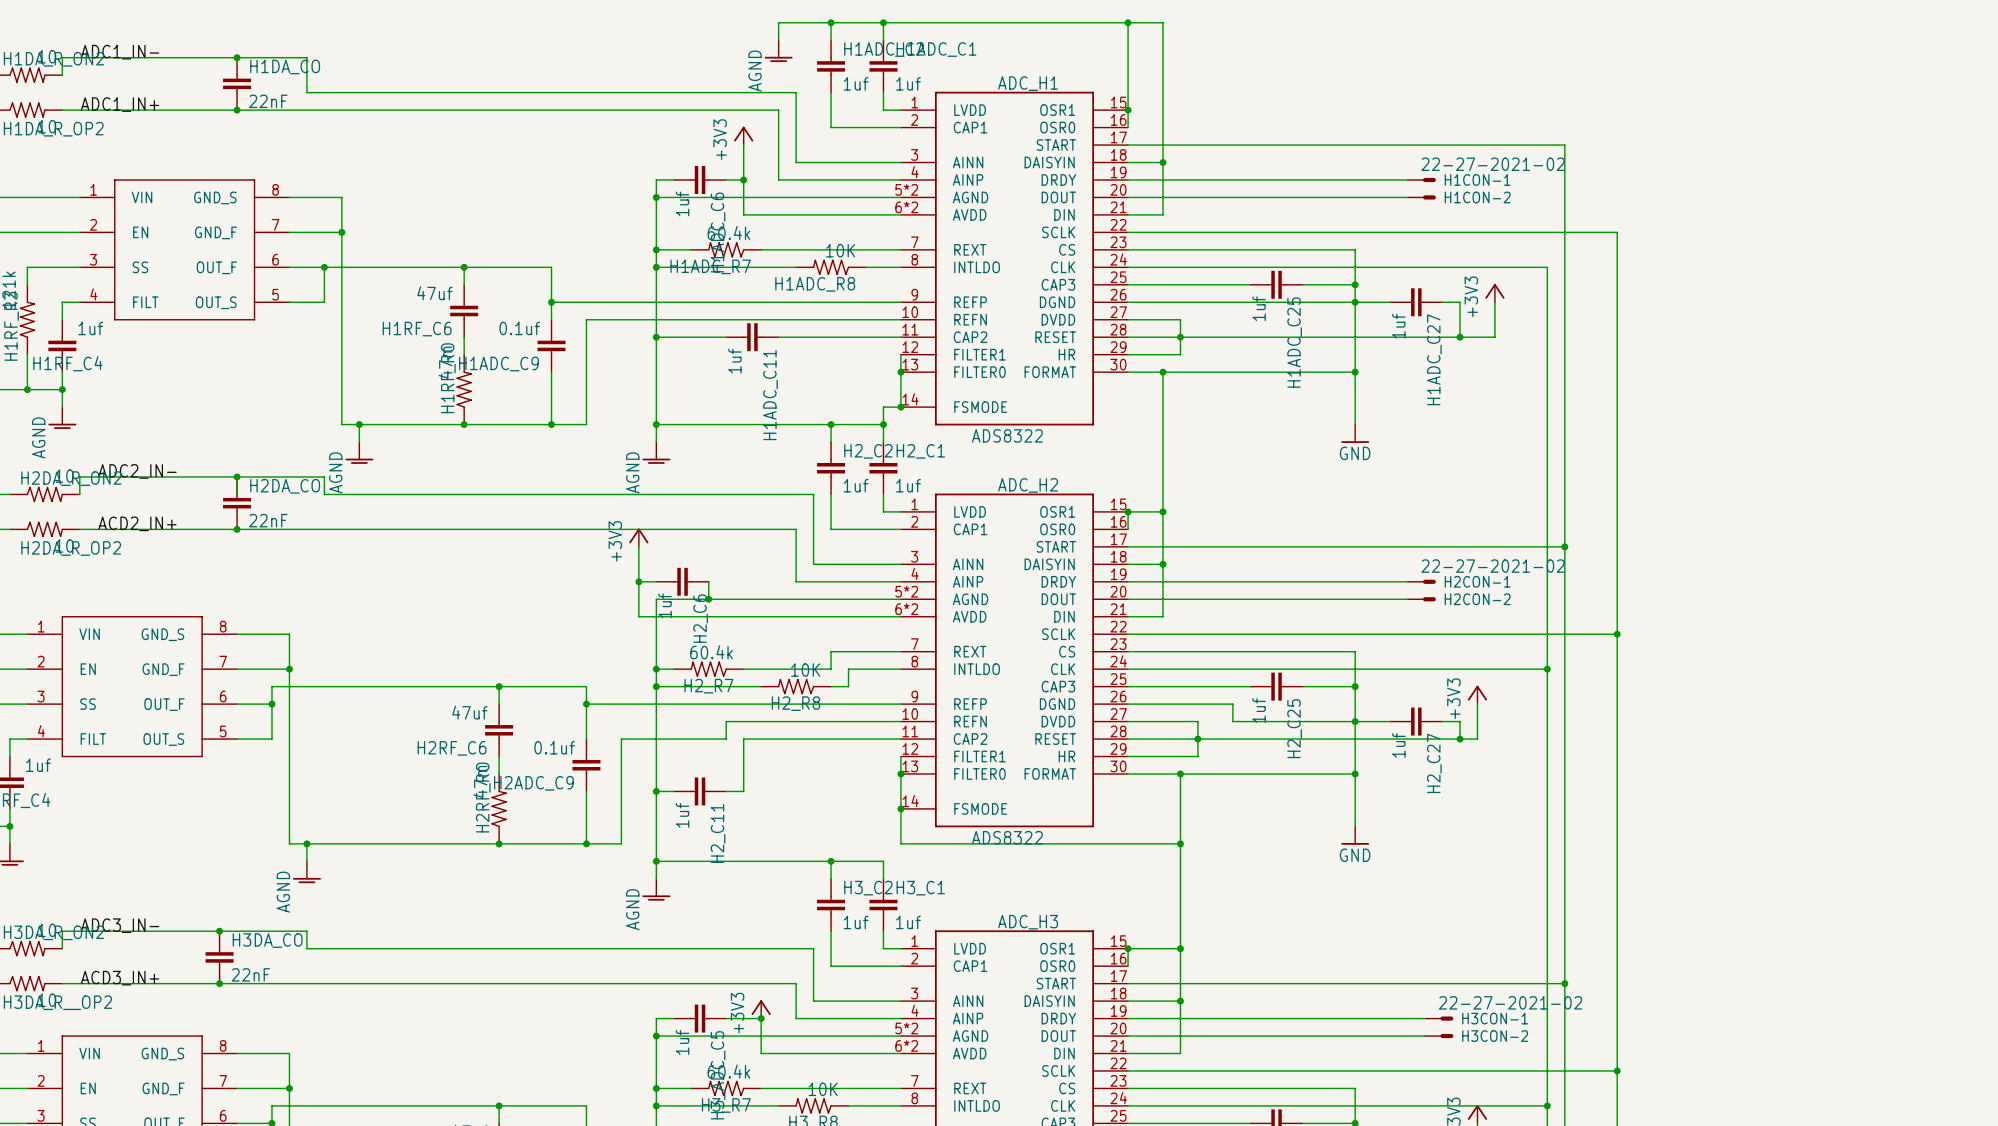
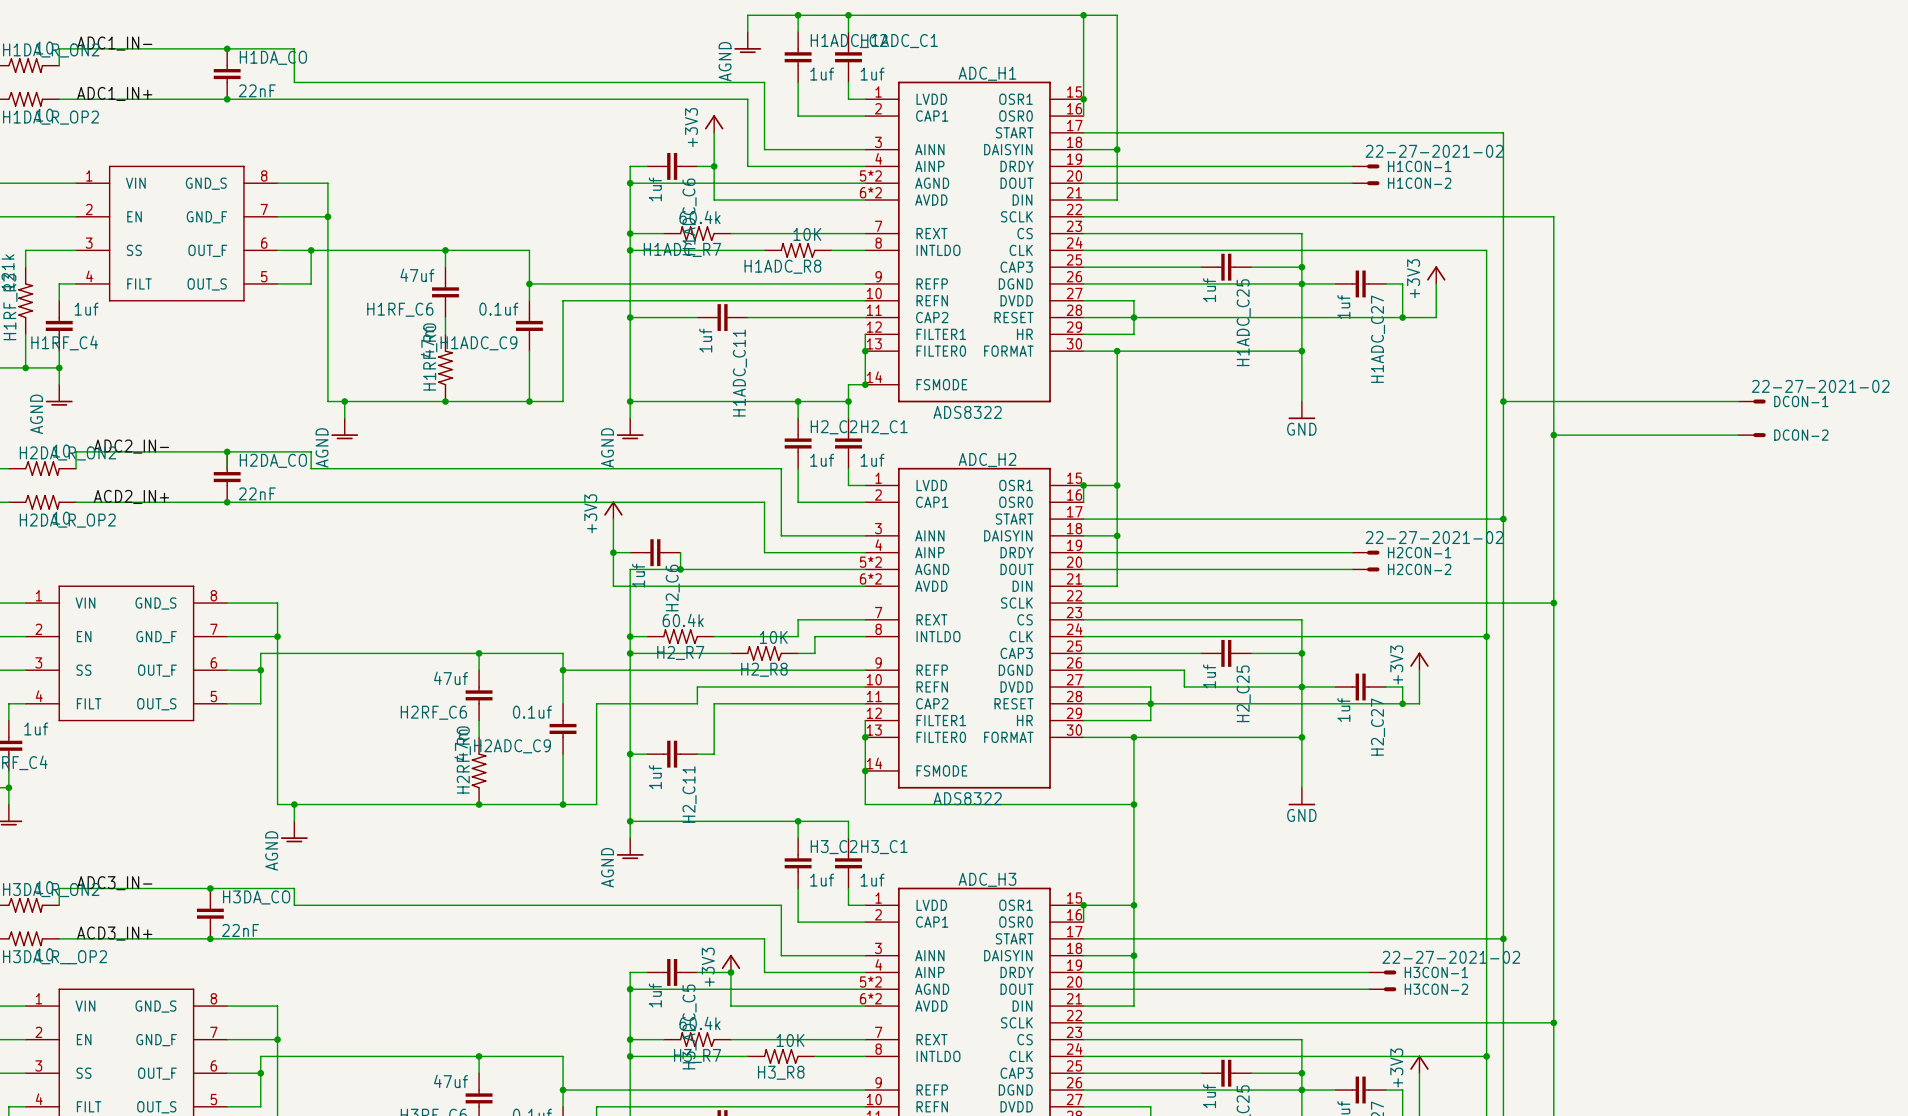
wire: none -> (1503, 401) (1738, 401)
junction: none -> (1503, 401)
DCON-1: none -> 22-27-2021-02 (1752, 401)
wire: none -> (1553, 435) (1738, 435)
junction: none -> (1553, 435)
DCON-2: none -> (1752, 435)

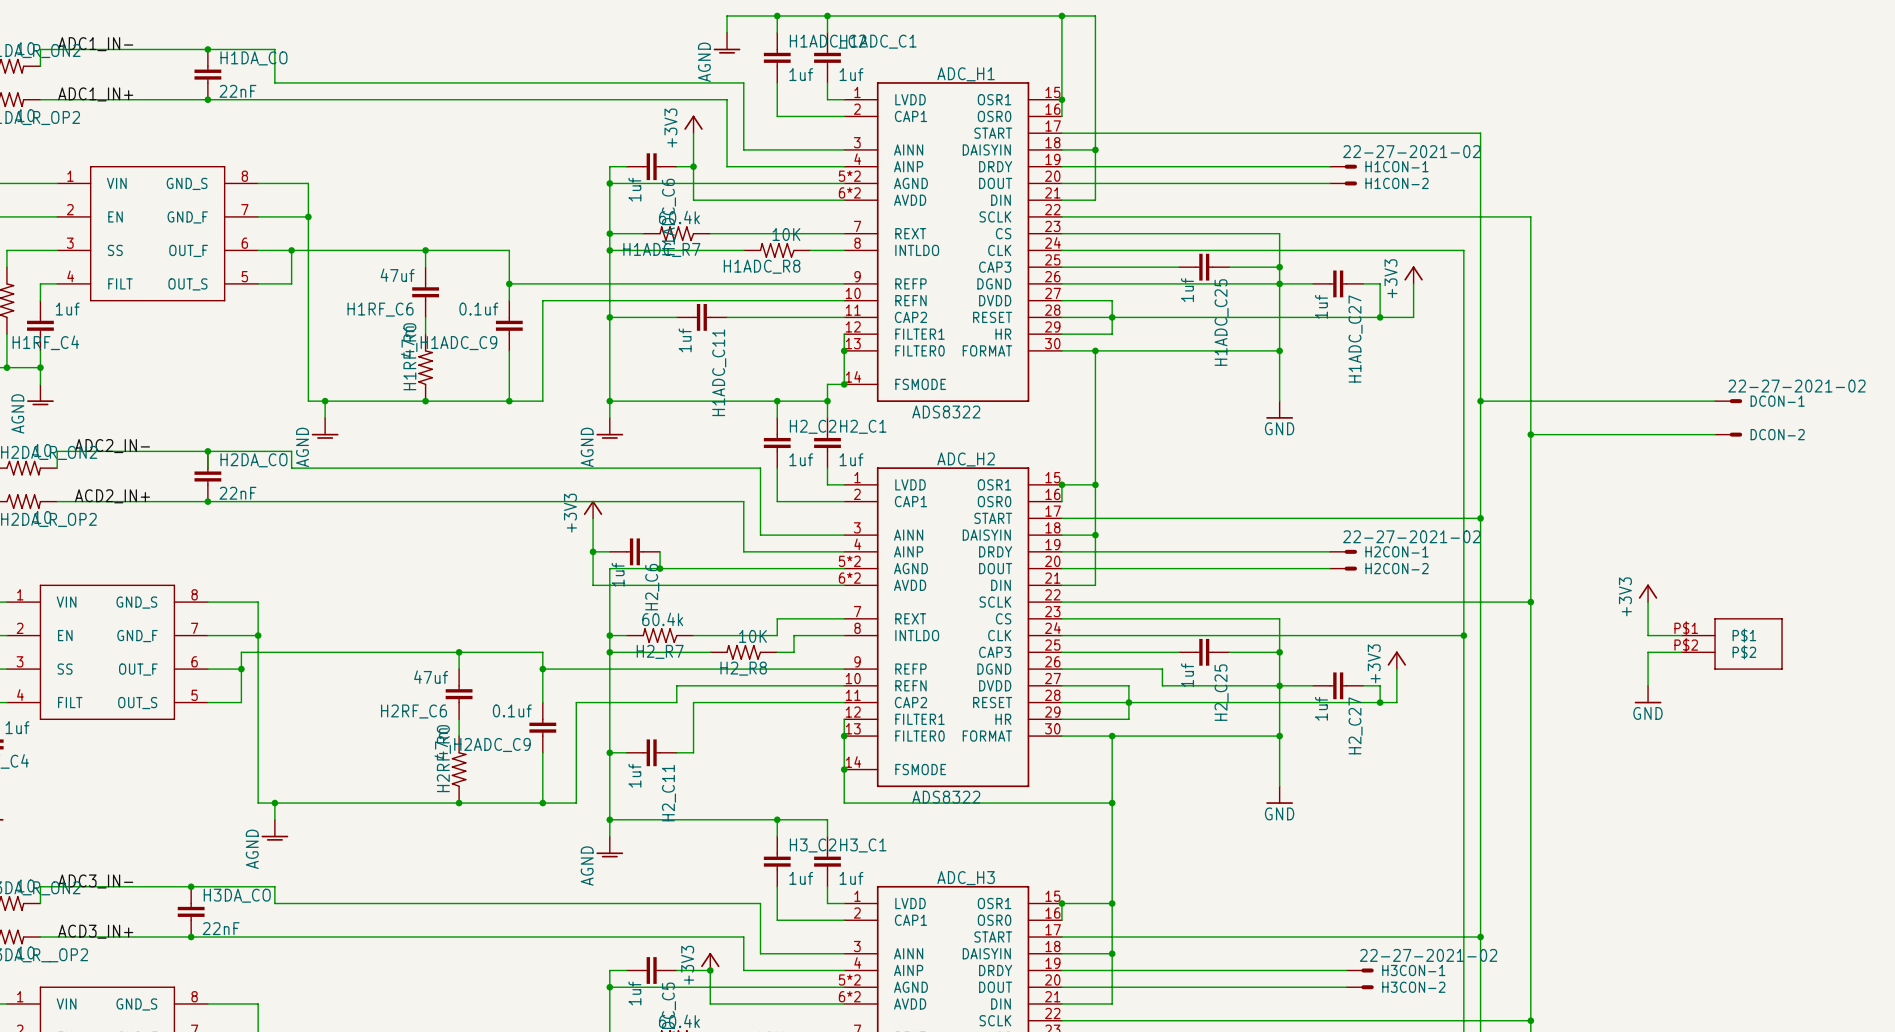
power symbol: none -> +3V3 (1648, 593)
wire: none -> (1648, 602) (1648, 635) (1681, 635)
part: none -> (1732, 643)
wire: none -> (1681, 652) (1648, 652) (1648, 685)
power symbol: none -> GND (1648, 694)

